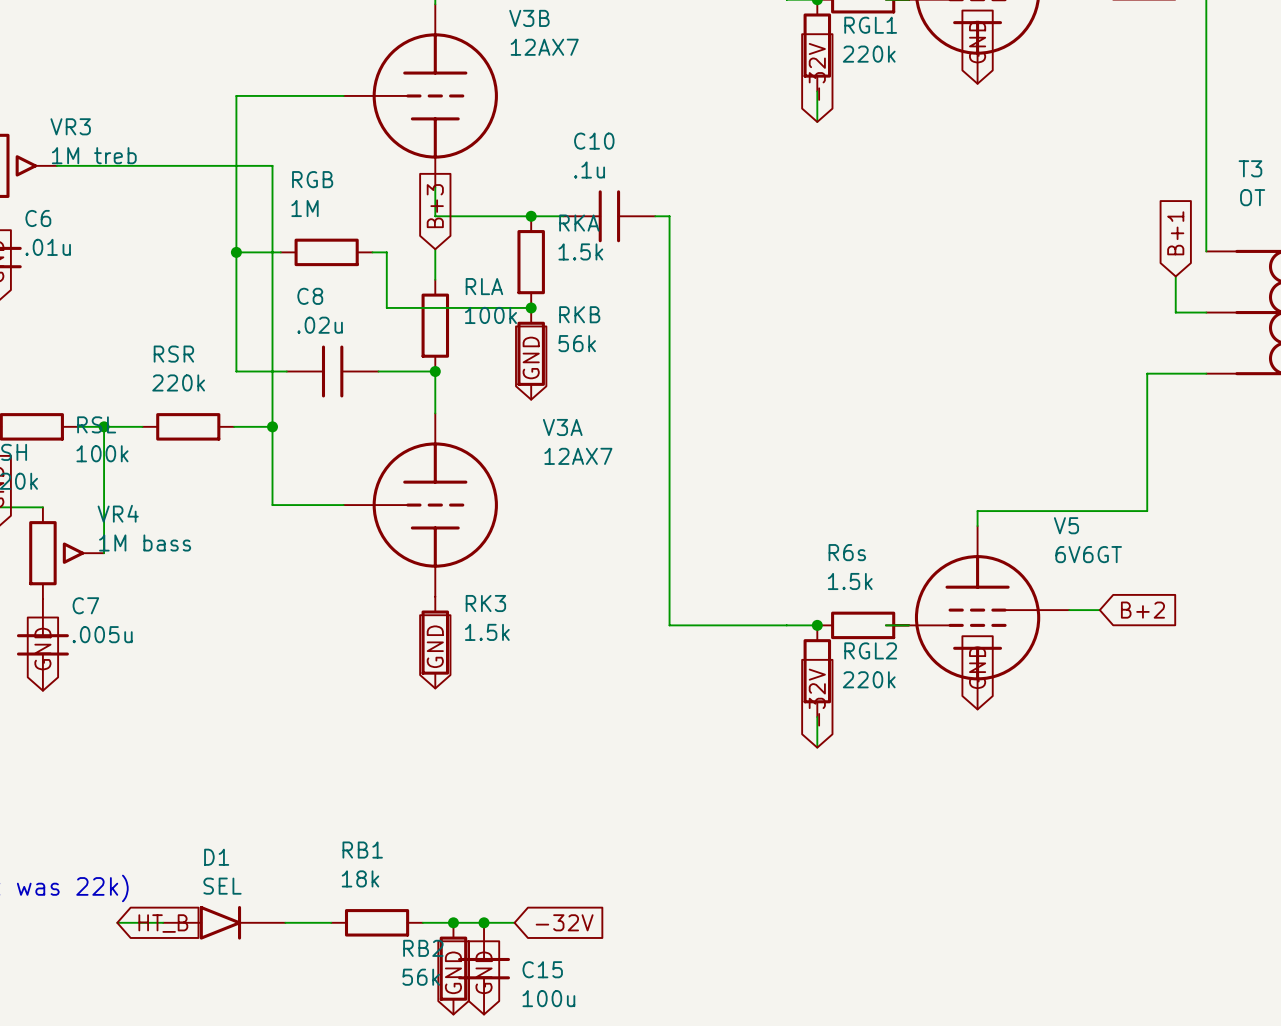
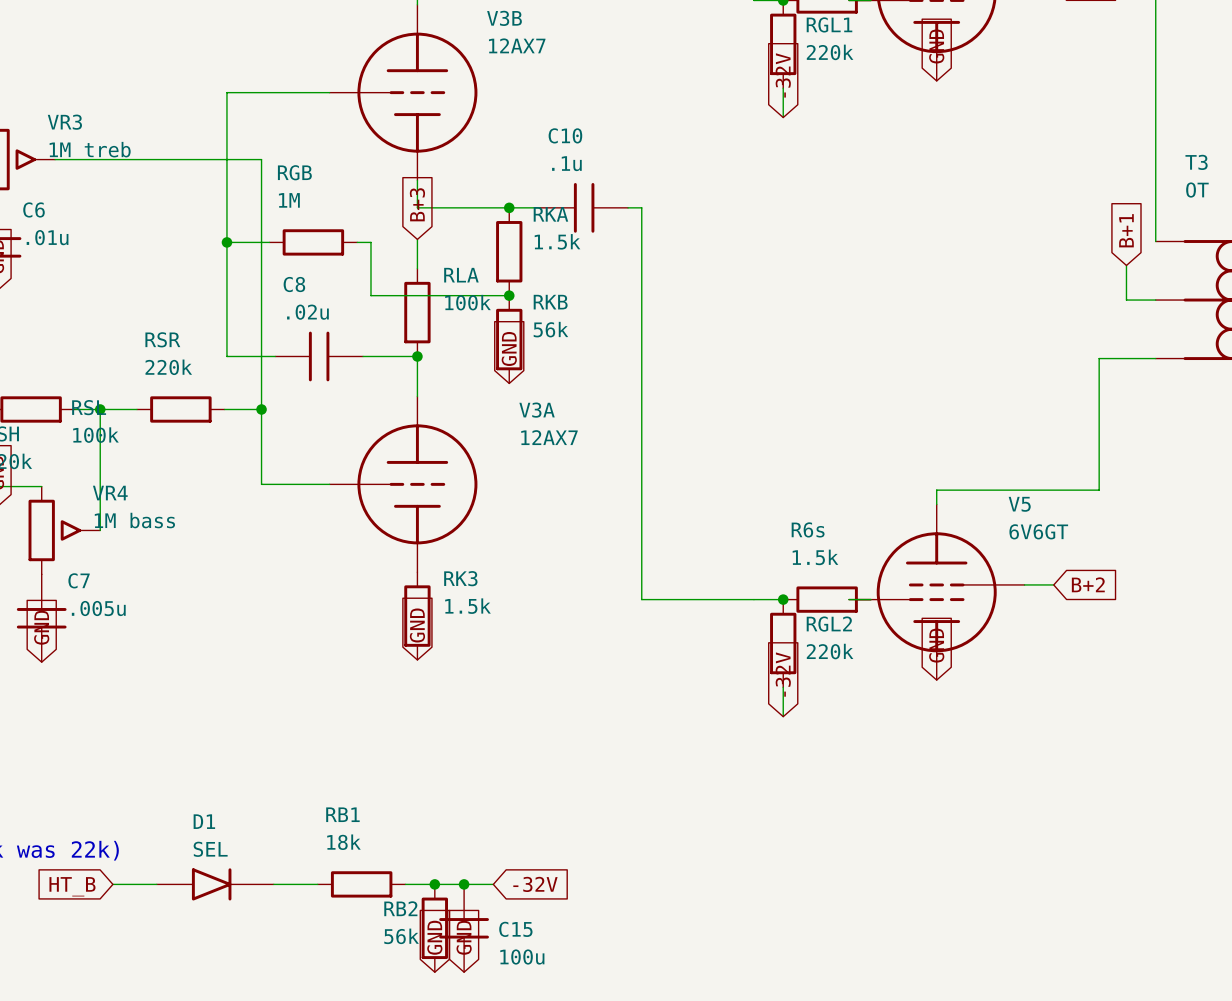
global label rotation: 0° (163, 923) -> 180° (72, 886)

